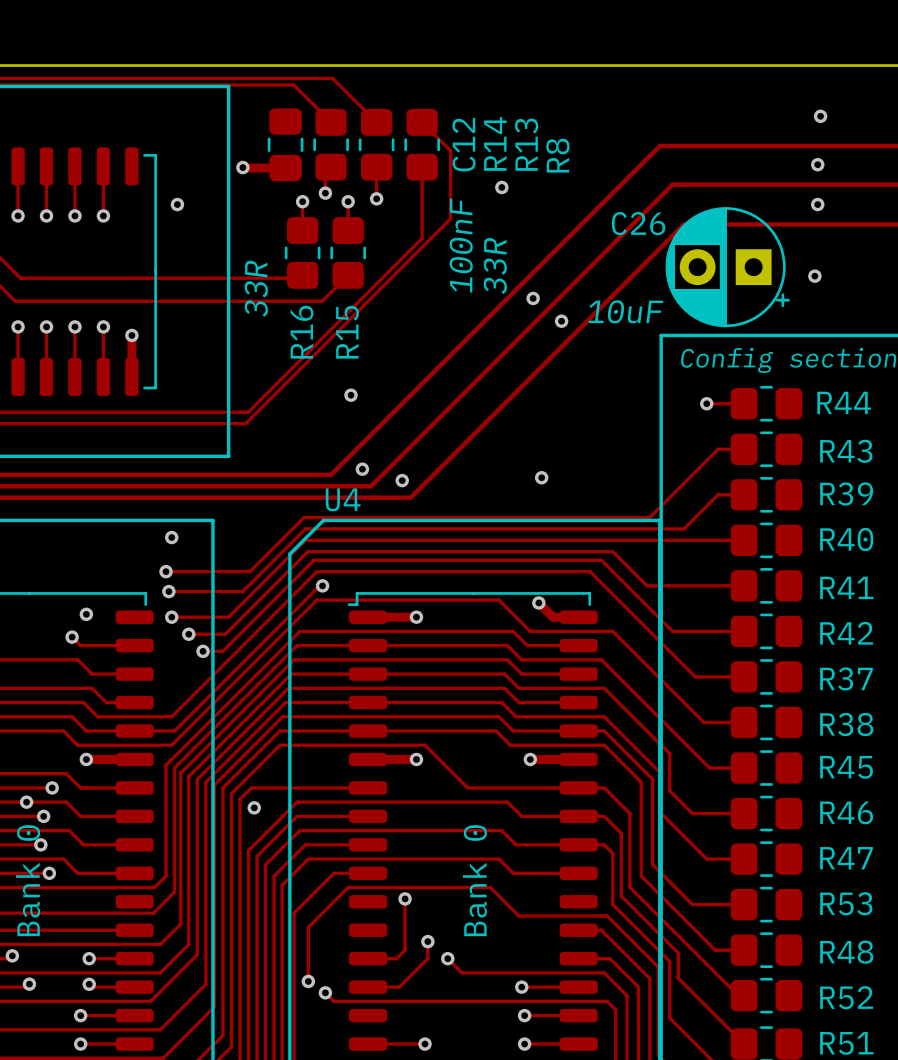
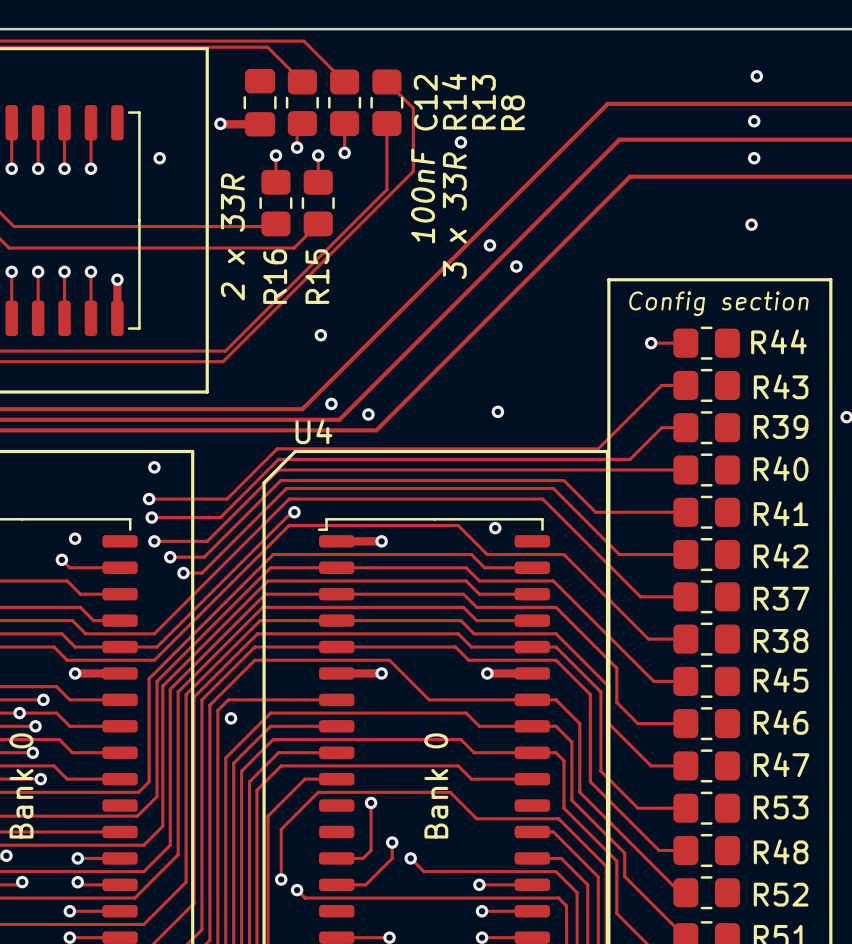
R13 value: 33R (495, 265) -> 3 x 33R (454, 215)
C26: 10uF (727, 267) -> none
R16 value: 33R (256, 288) -> 2 x 33R (232, 236)
track: (538, 602) (553, 617) (578, 617) -> none

